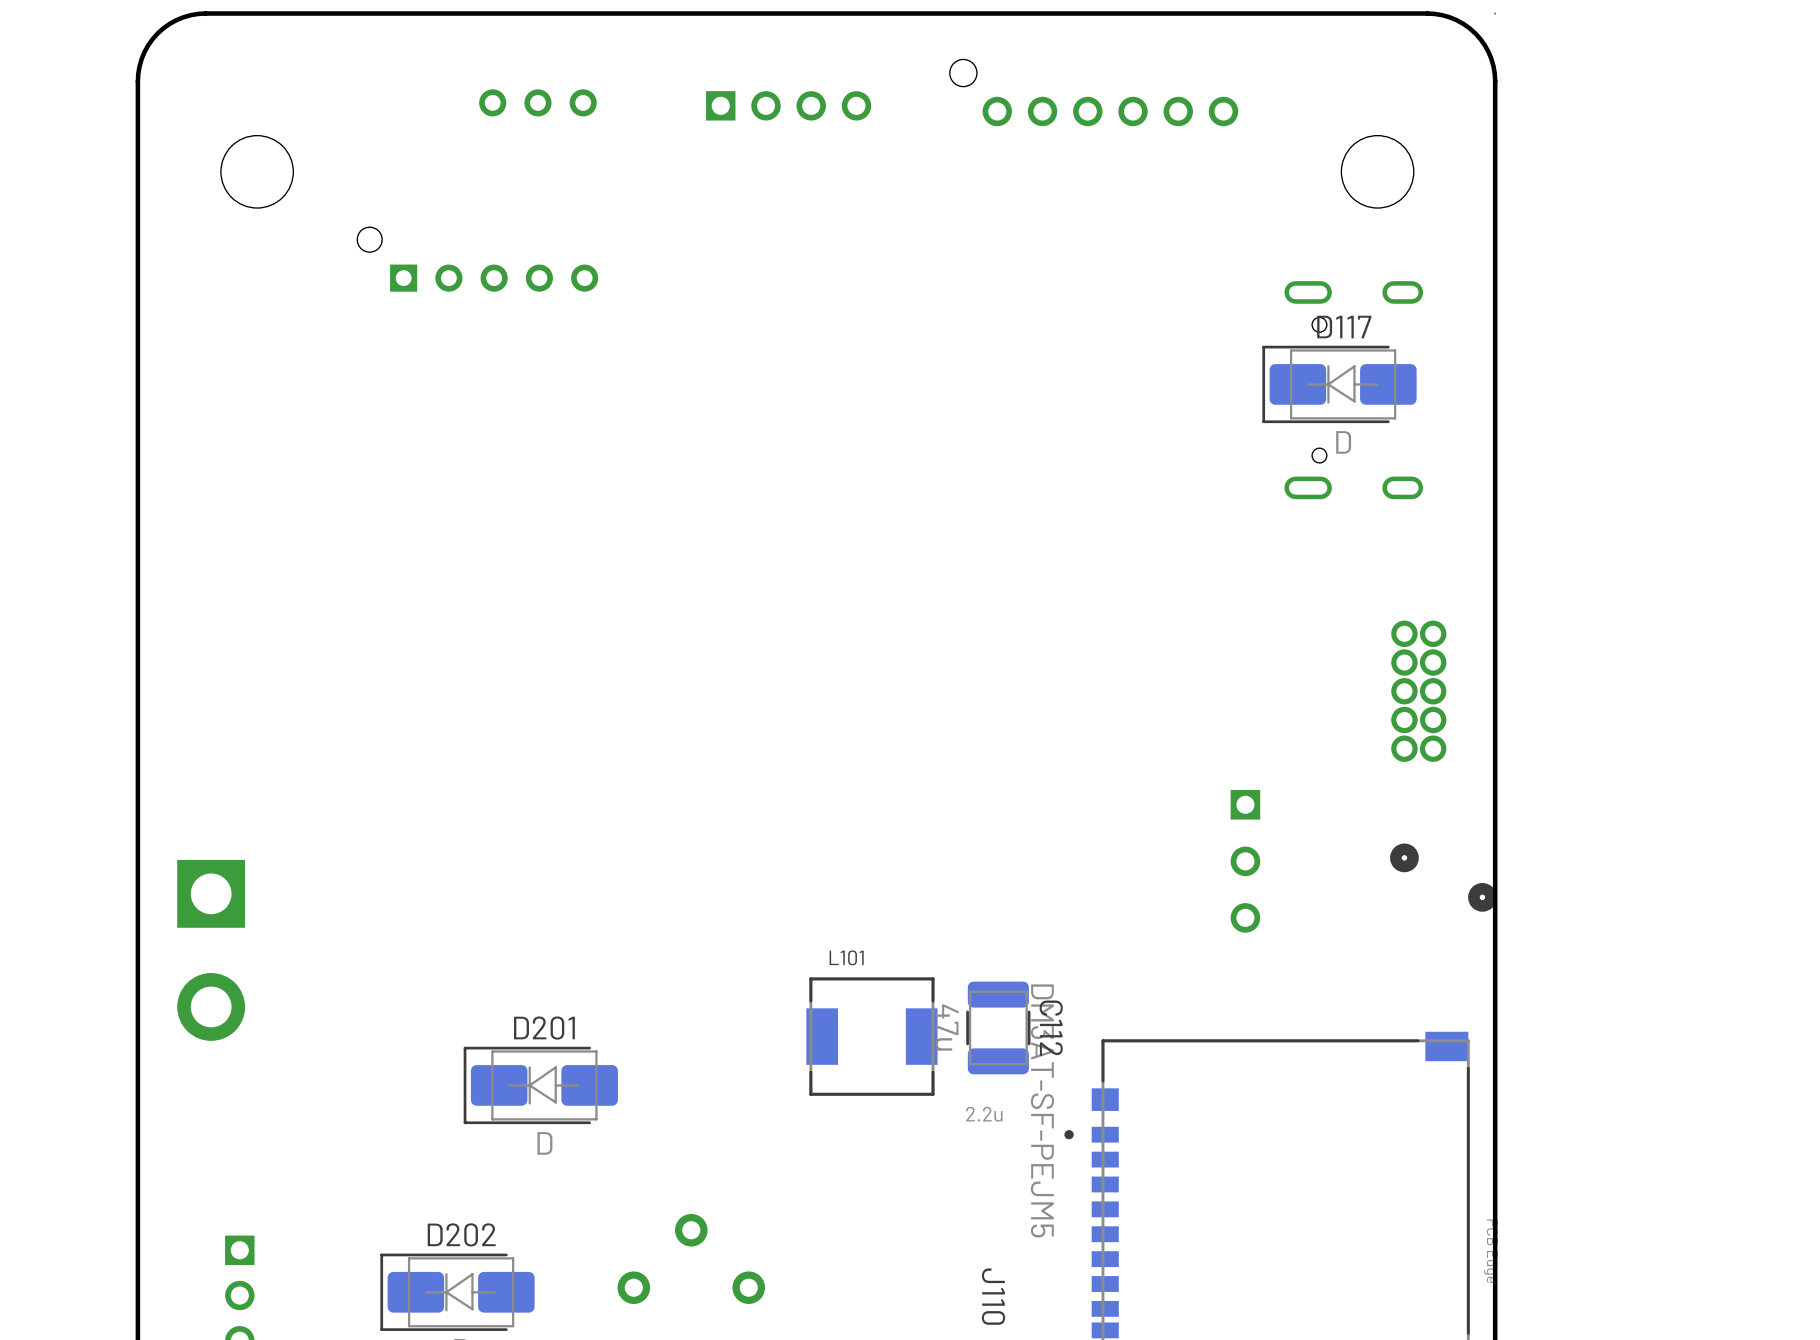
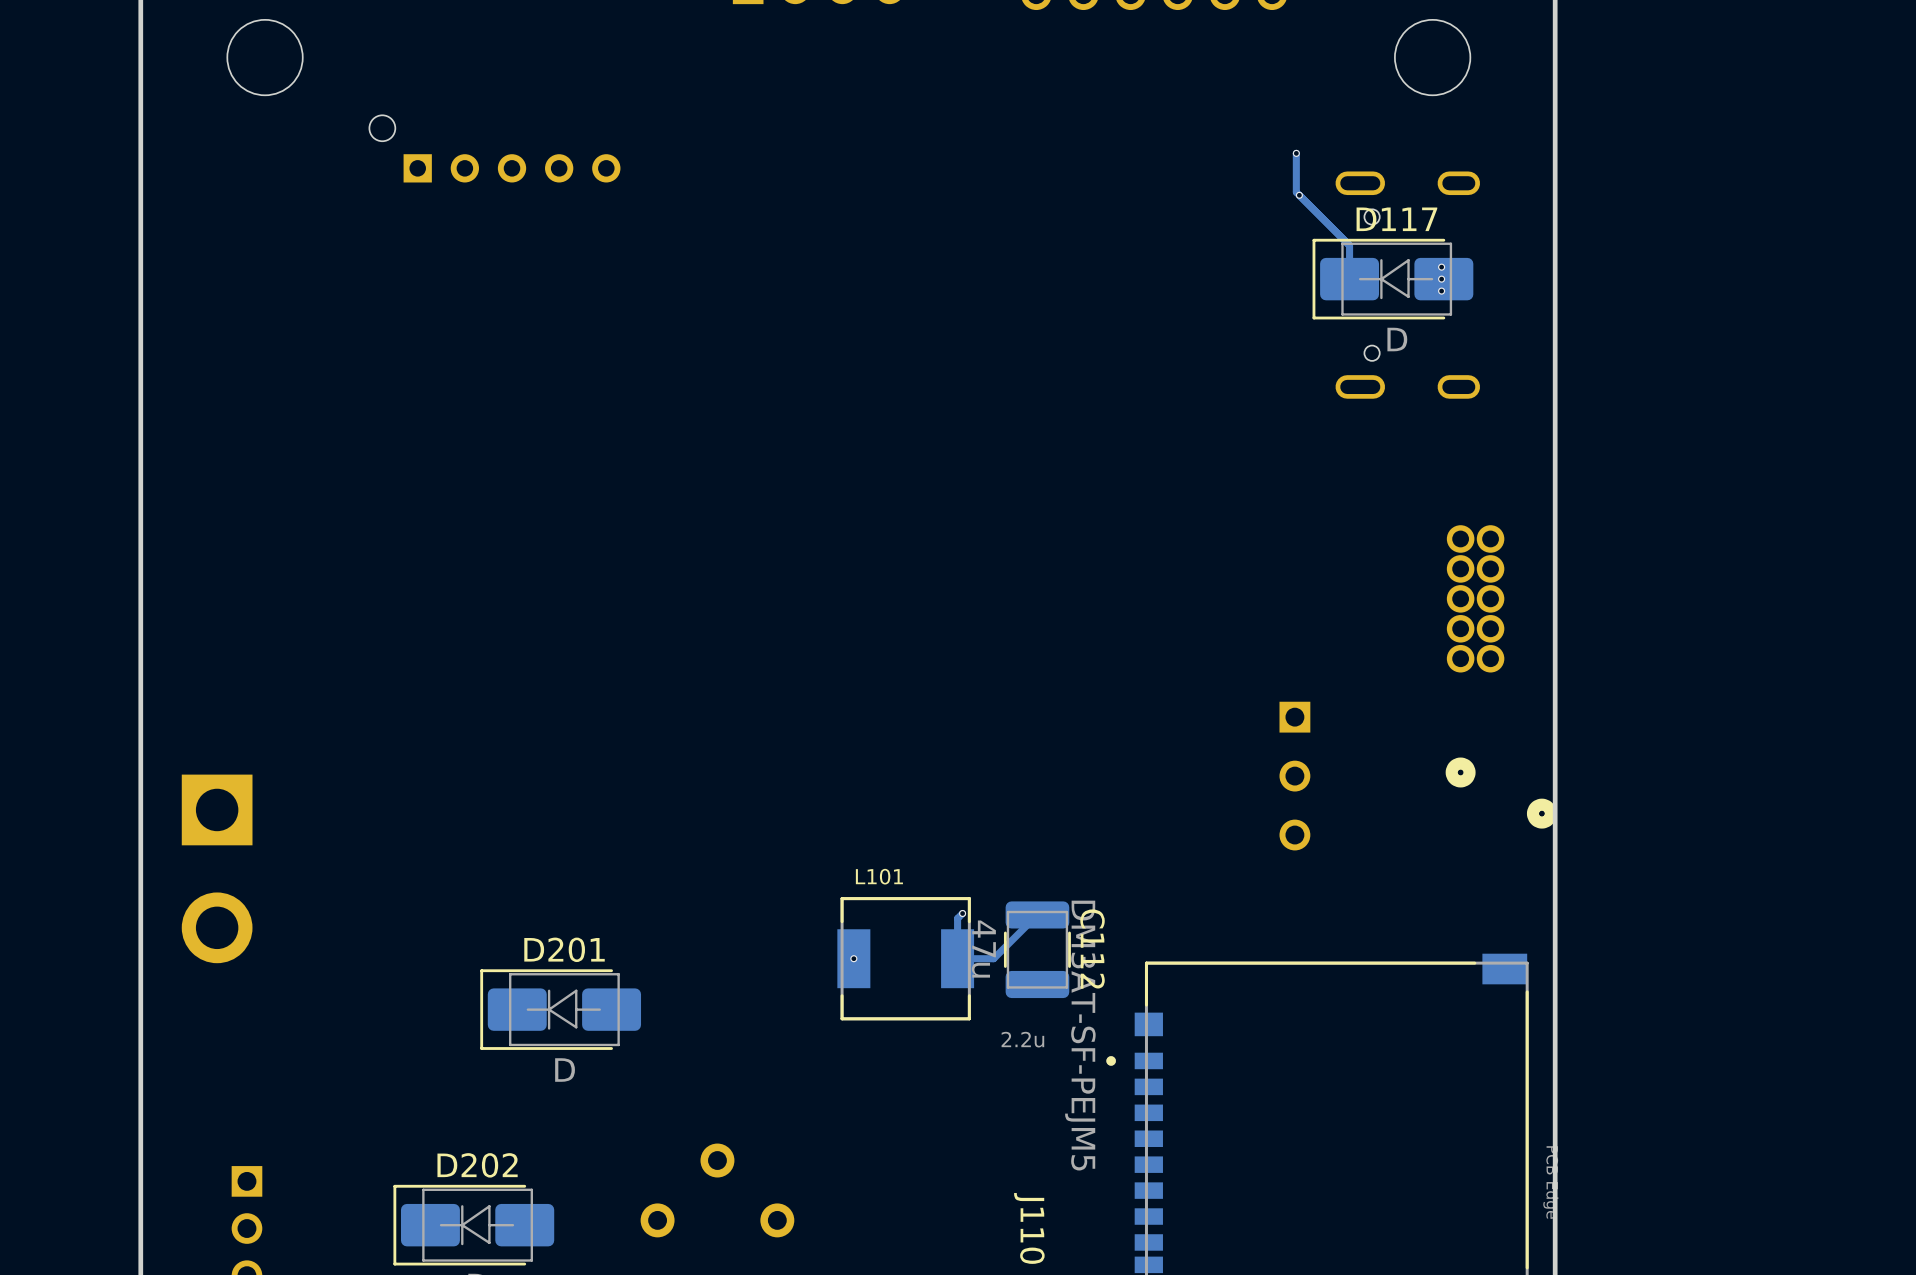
track: none -> (1296, 153) (1296, 192) (1349, 245) (1349, 279)
via: none -> (1296, 153)
via: none -> (1299, 195)
via: none -> (1441, 267)
via: none -> (1441, 279)
via: none -> (1441, 291)
track: none -> (962, 913) (957, 918) (957, 958) (993, 958) (1037, 914)
via: none -> (962, 913)
via: none -> (853, 958)

